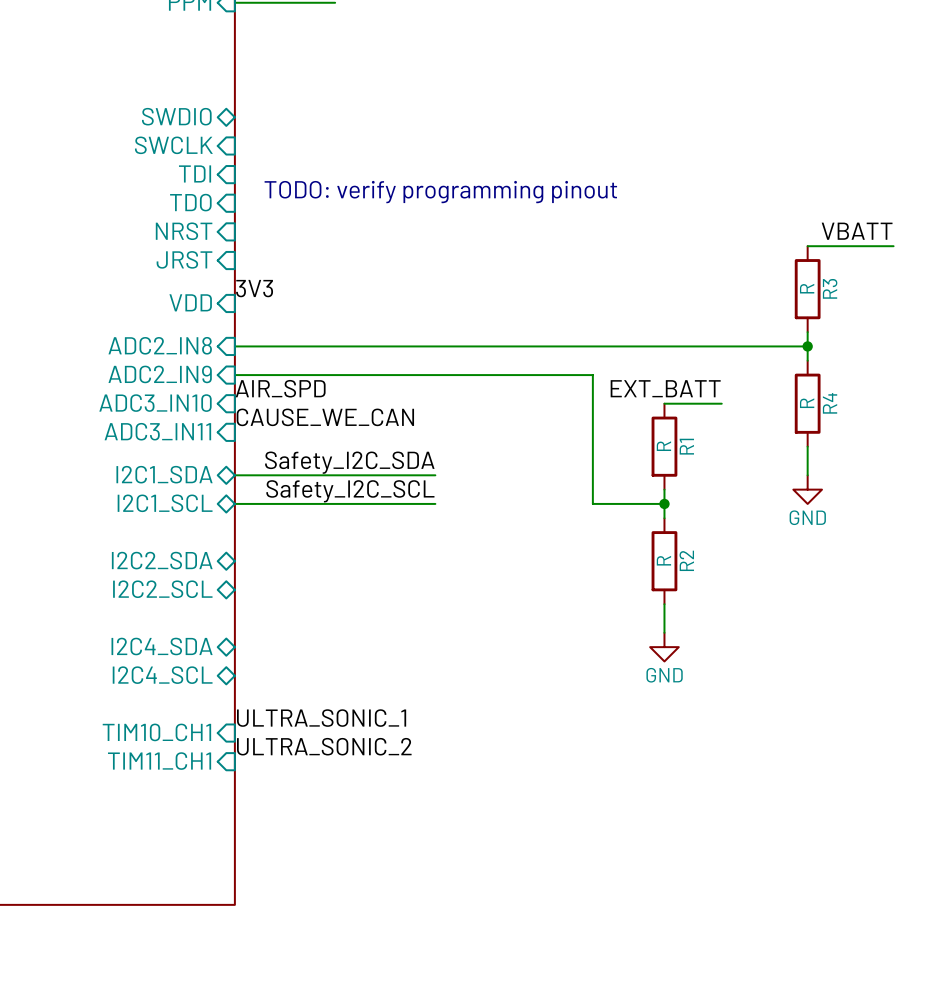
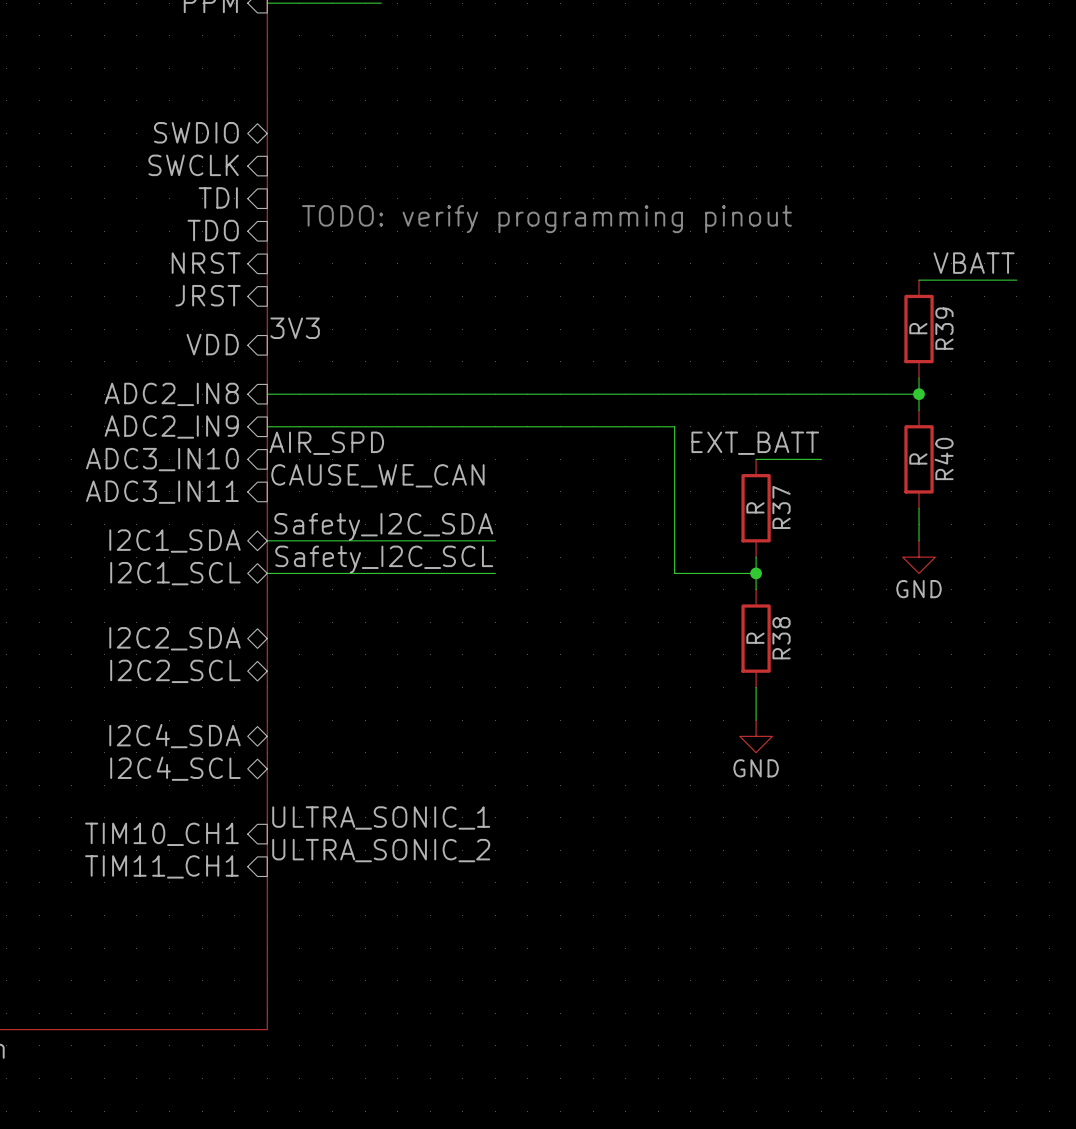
R3 name: R3 (830, 288) -> R39 (944, 328)
R4 name: R4 (830, 403) -> R40 (944, 458)
R1 name: R1 (686, 446) -> R37 (781, 507)
R2 name: R2 (686, 560) -> R38 (781, 638)

